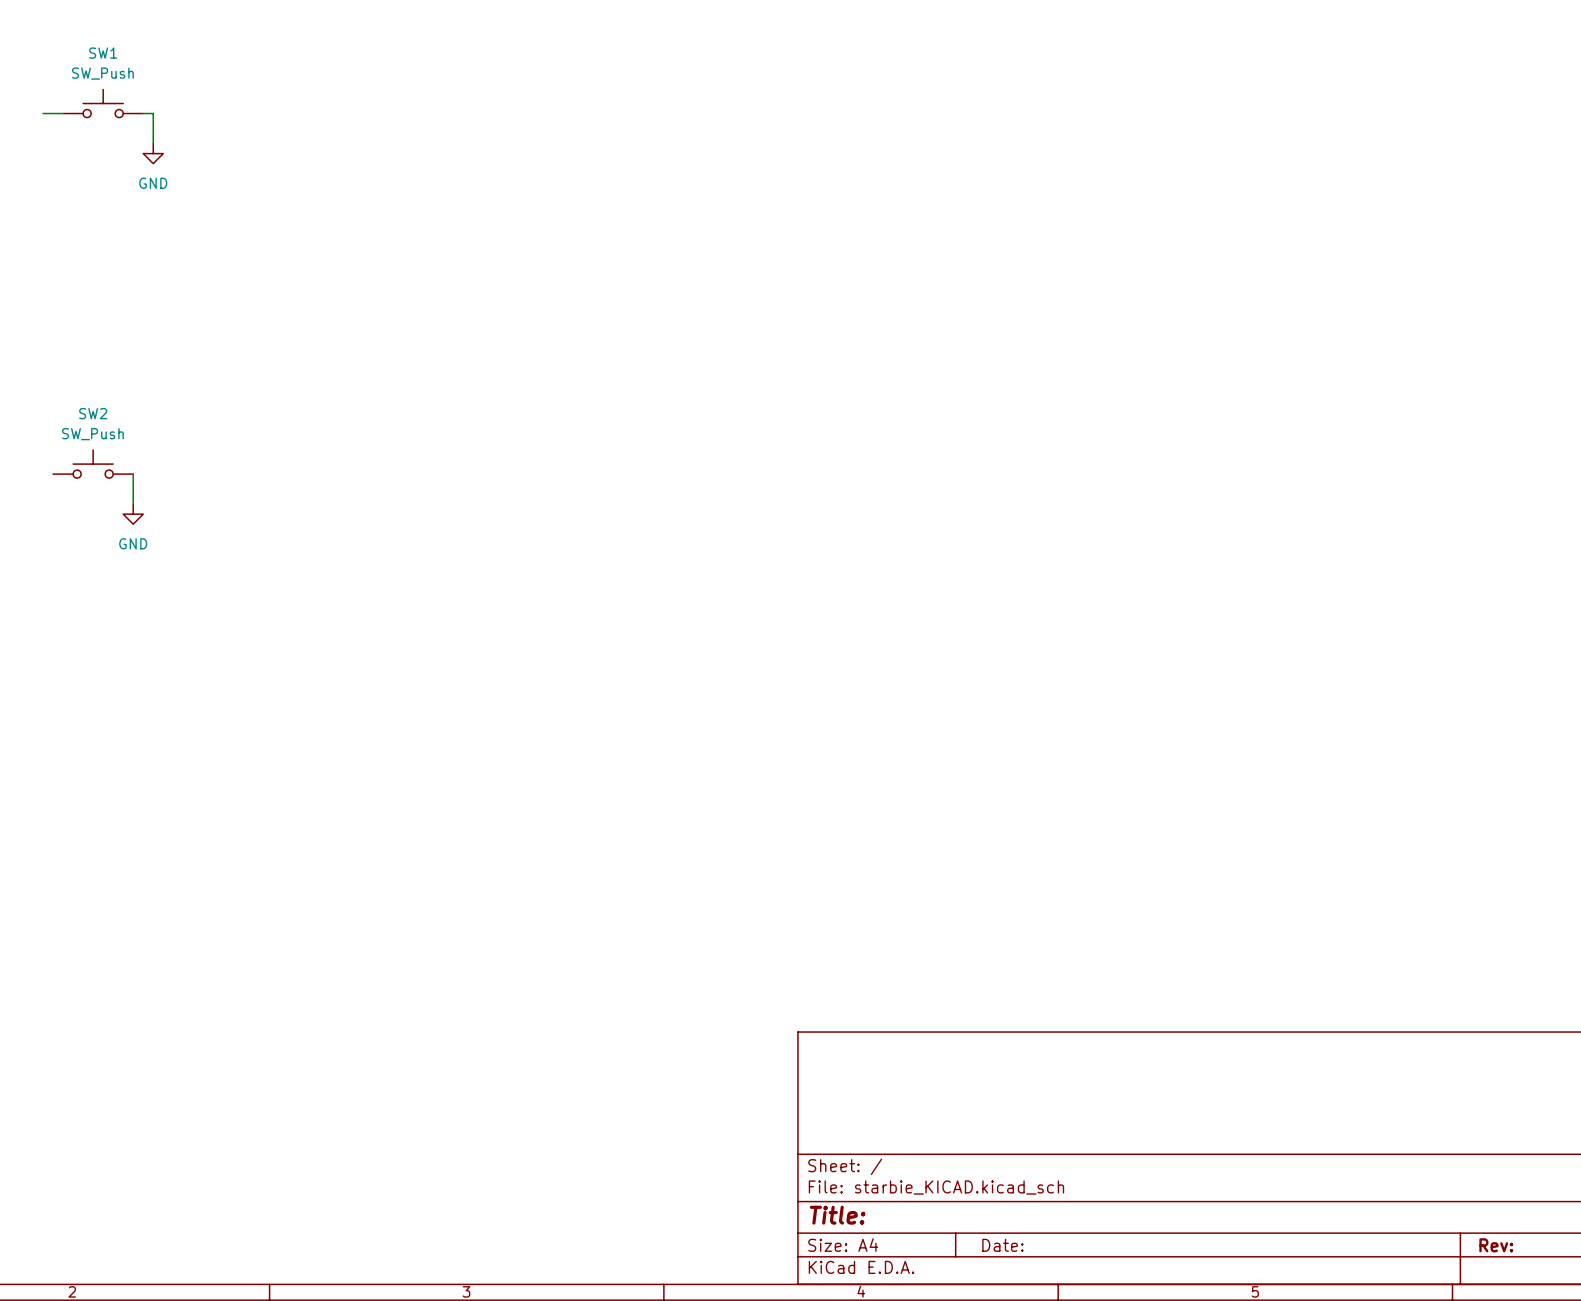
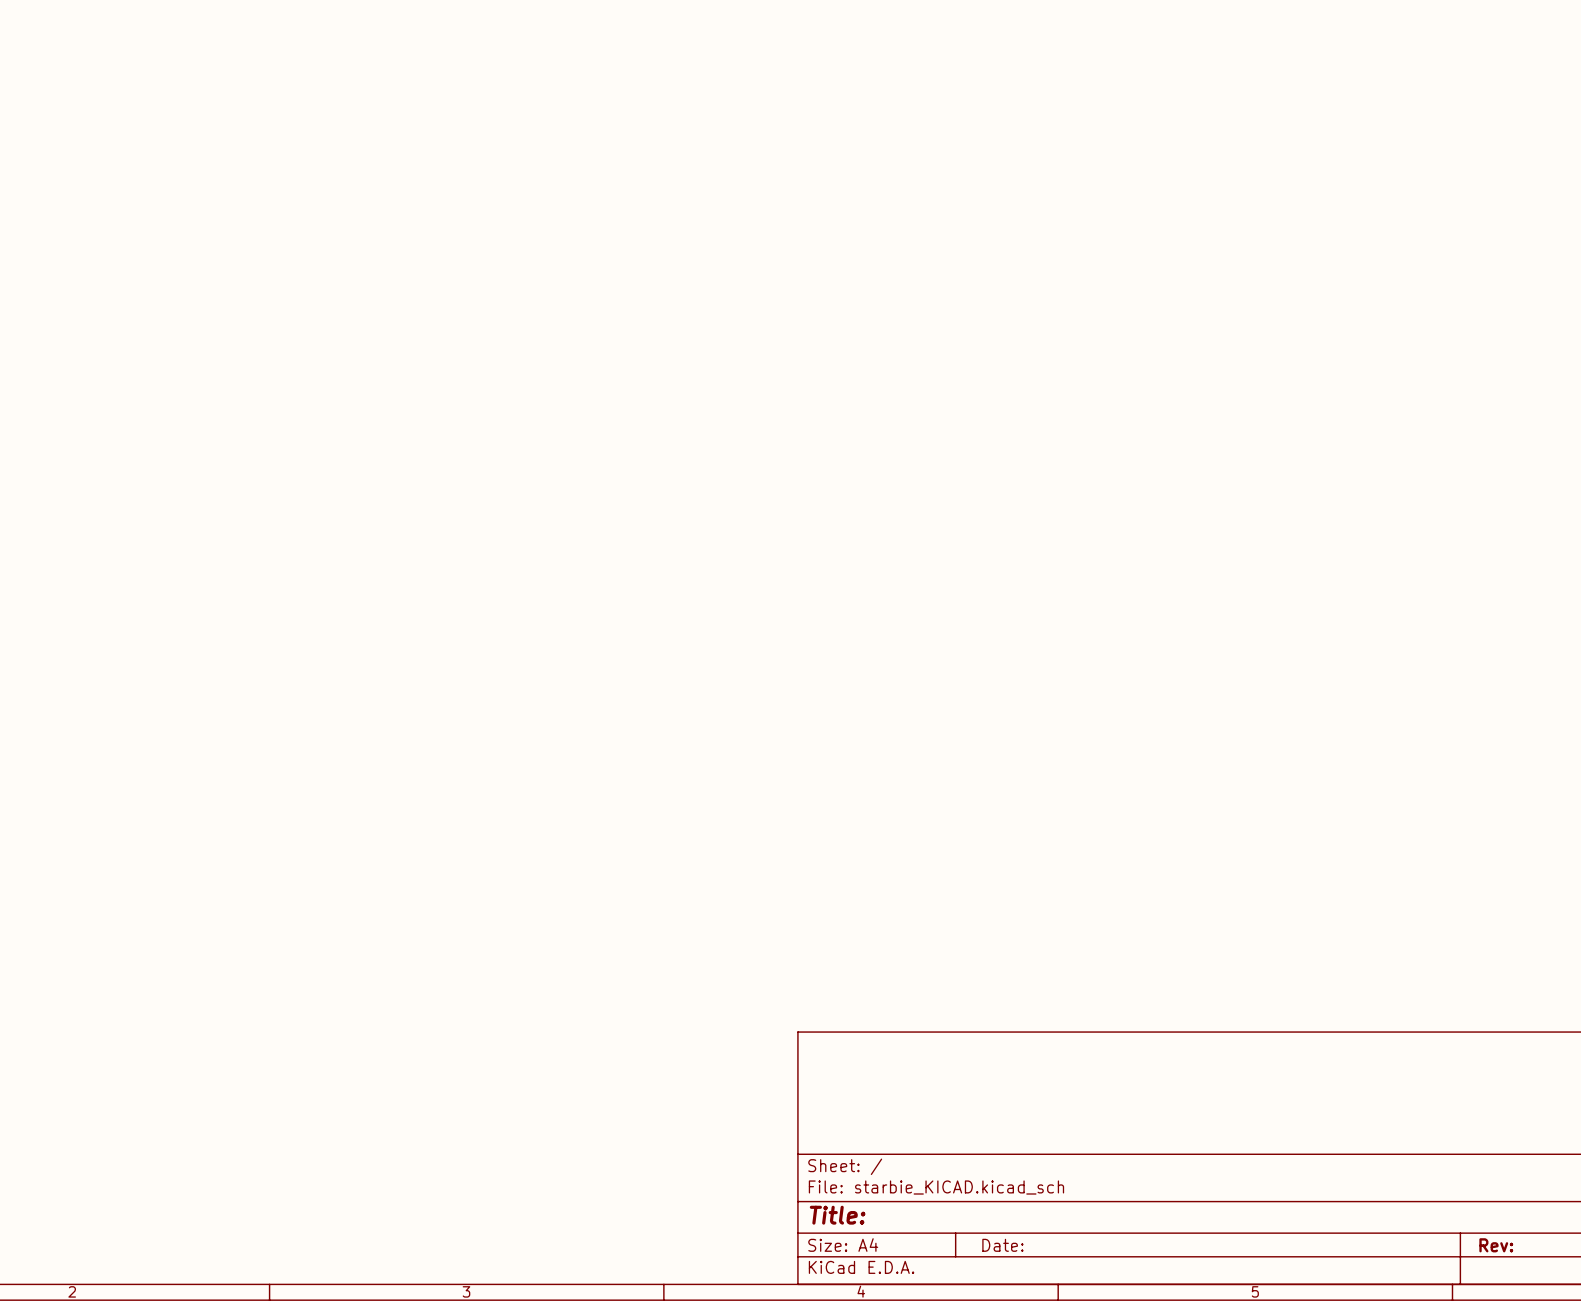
SW1: SW_Push (103, 103) -> none
wire: (43, 113) (63, 113) -> none
wire: (143, 113) (153, 113) (153, 143) -> none
power symbol: GND (153, 153) -> none
SW2: SW_Push (93, 464) -> none
wire: (133, 474) (133, 504) -> none
power symbol: GND (133, 514) -> none

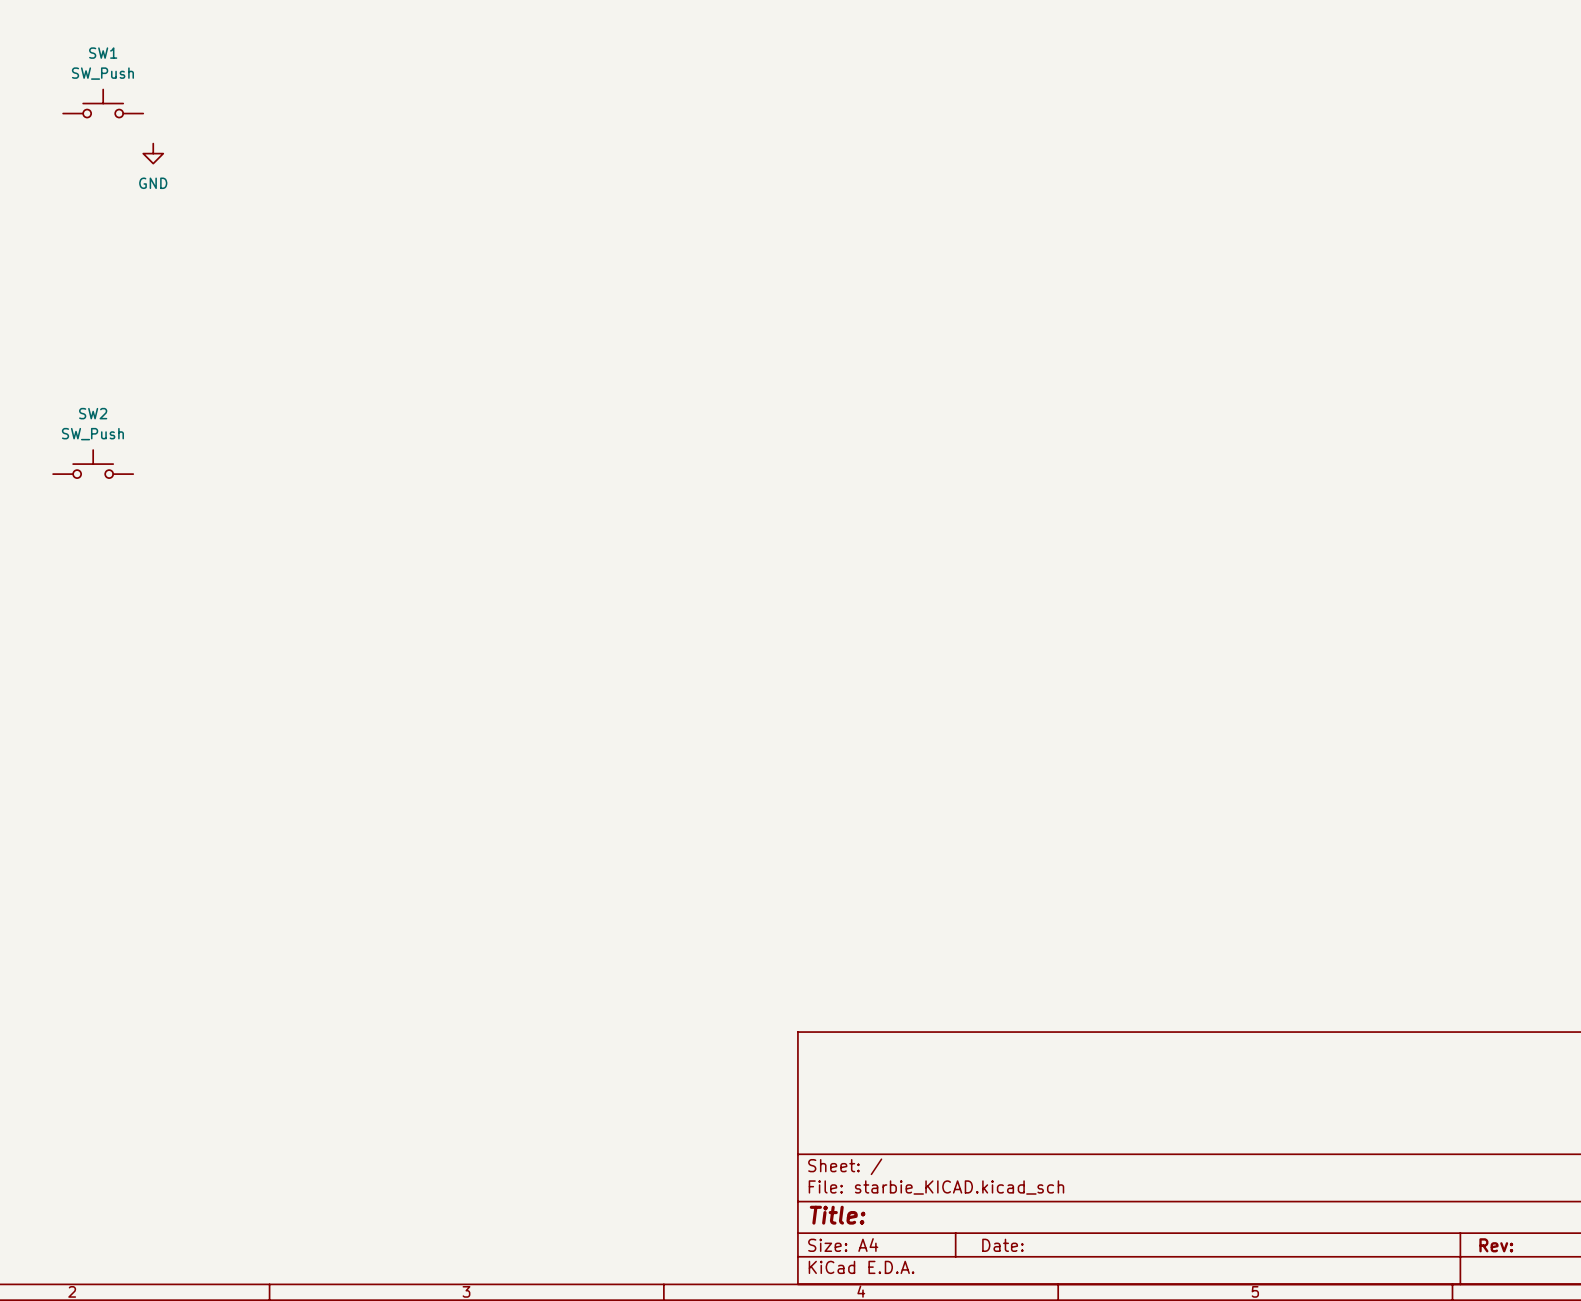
SW1: none -> SW_Push (103, 103)
power symbol: none -> GND (153, 153)
SW2: none -> SW_Push (93, 464)

